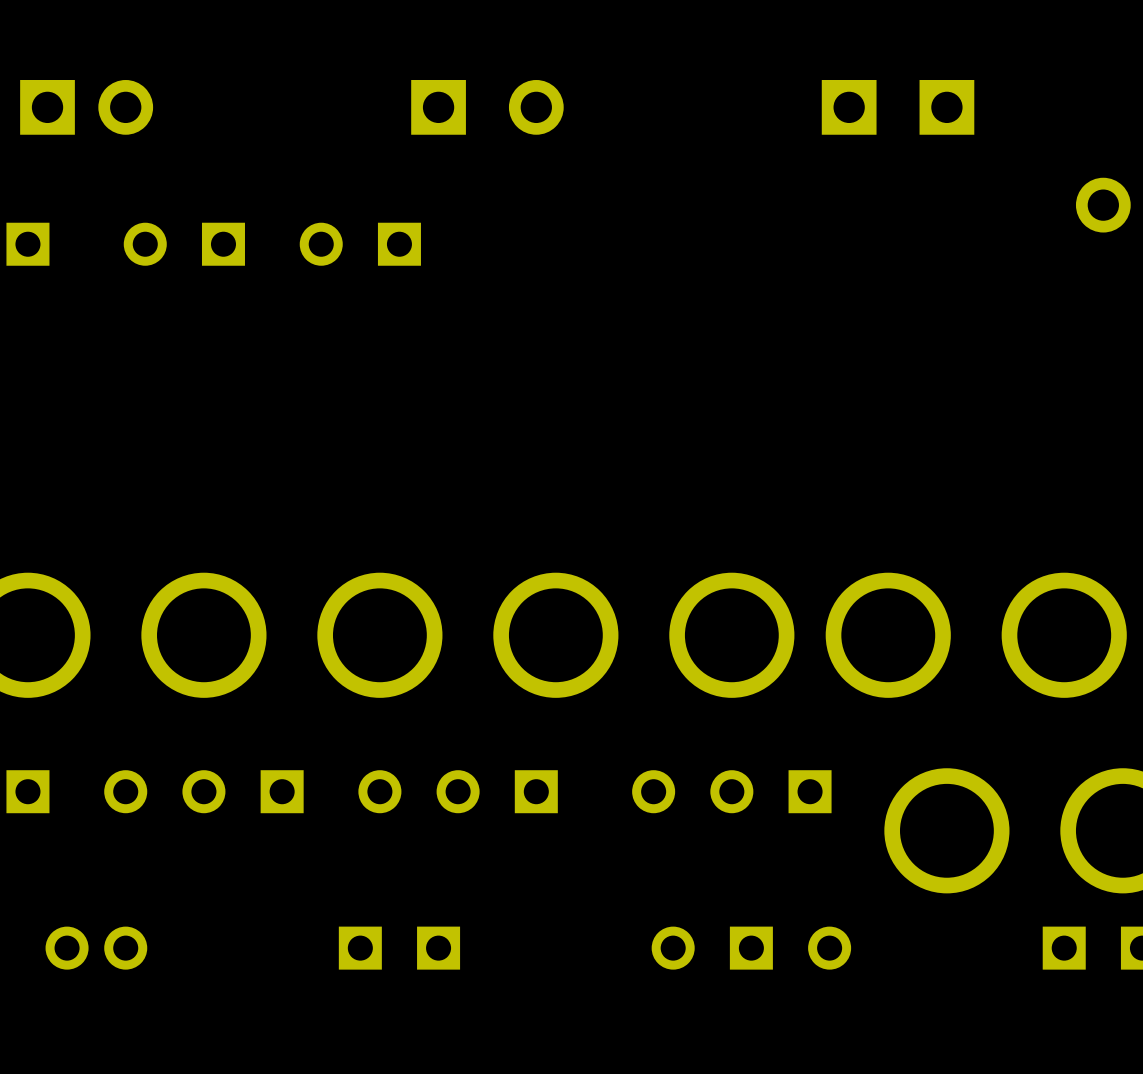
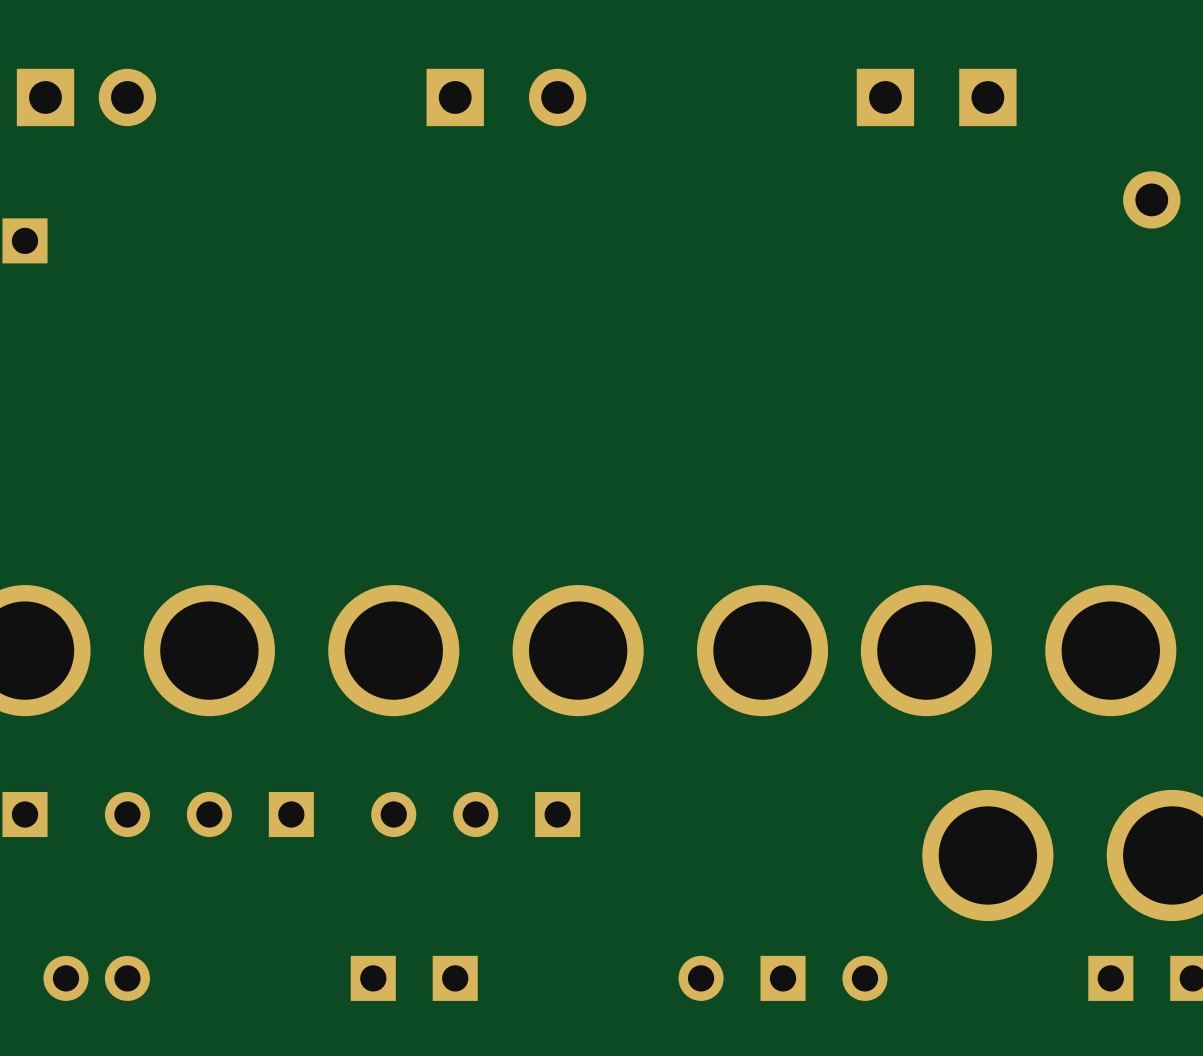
part: (184, 244) -> none
part: (360, 244) -> none
part: (731, 791) -> none

